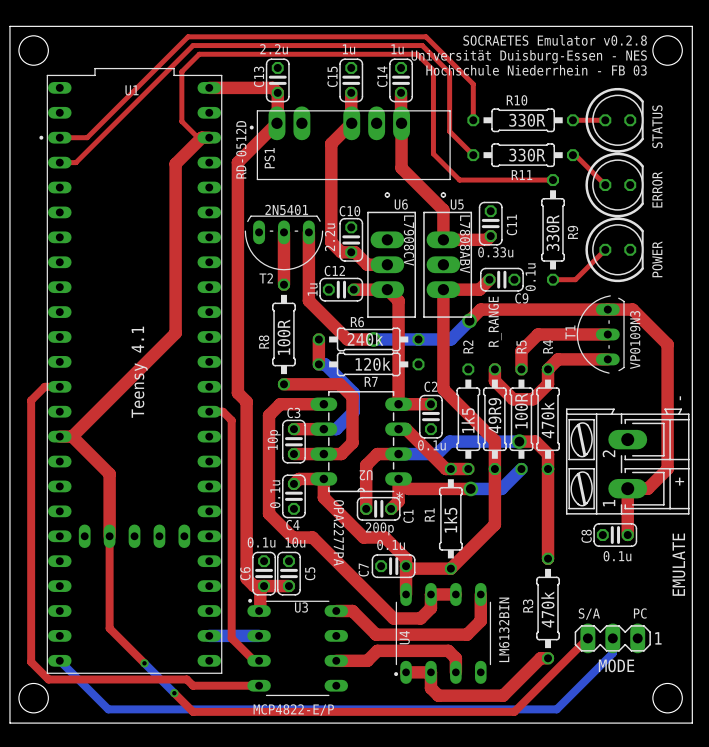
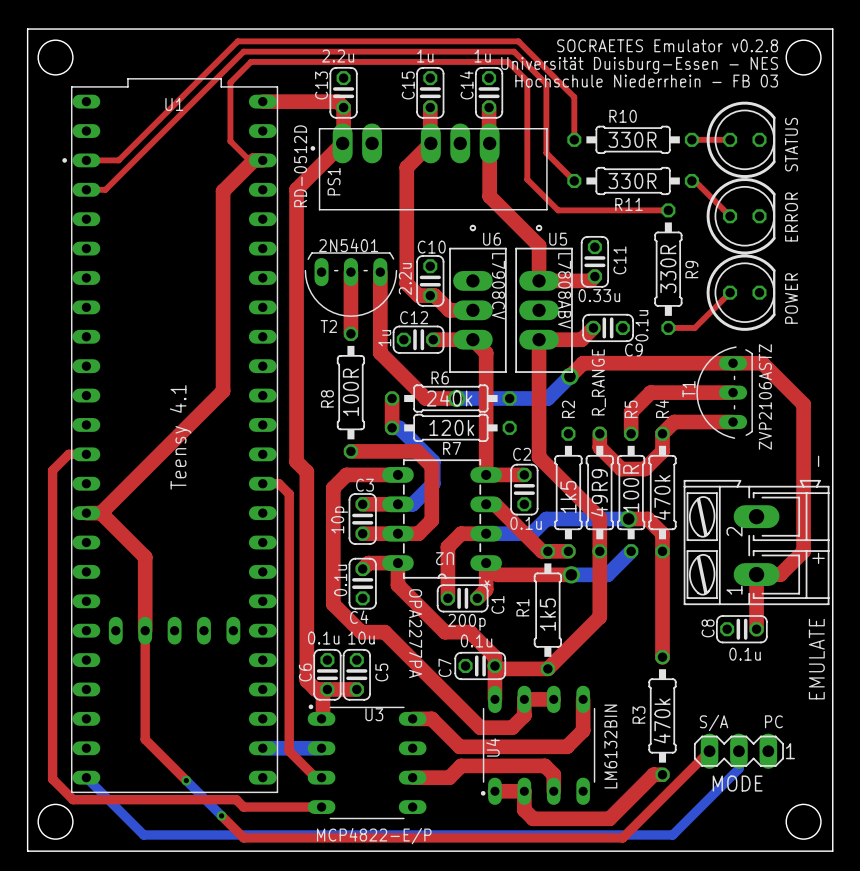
T1 value: VP0109N3 (635, 340) -> ZVP2106ASTZ (765, 396)

